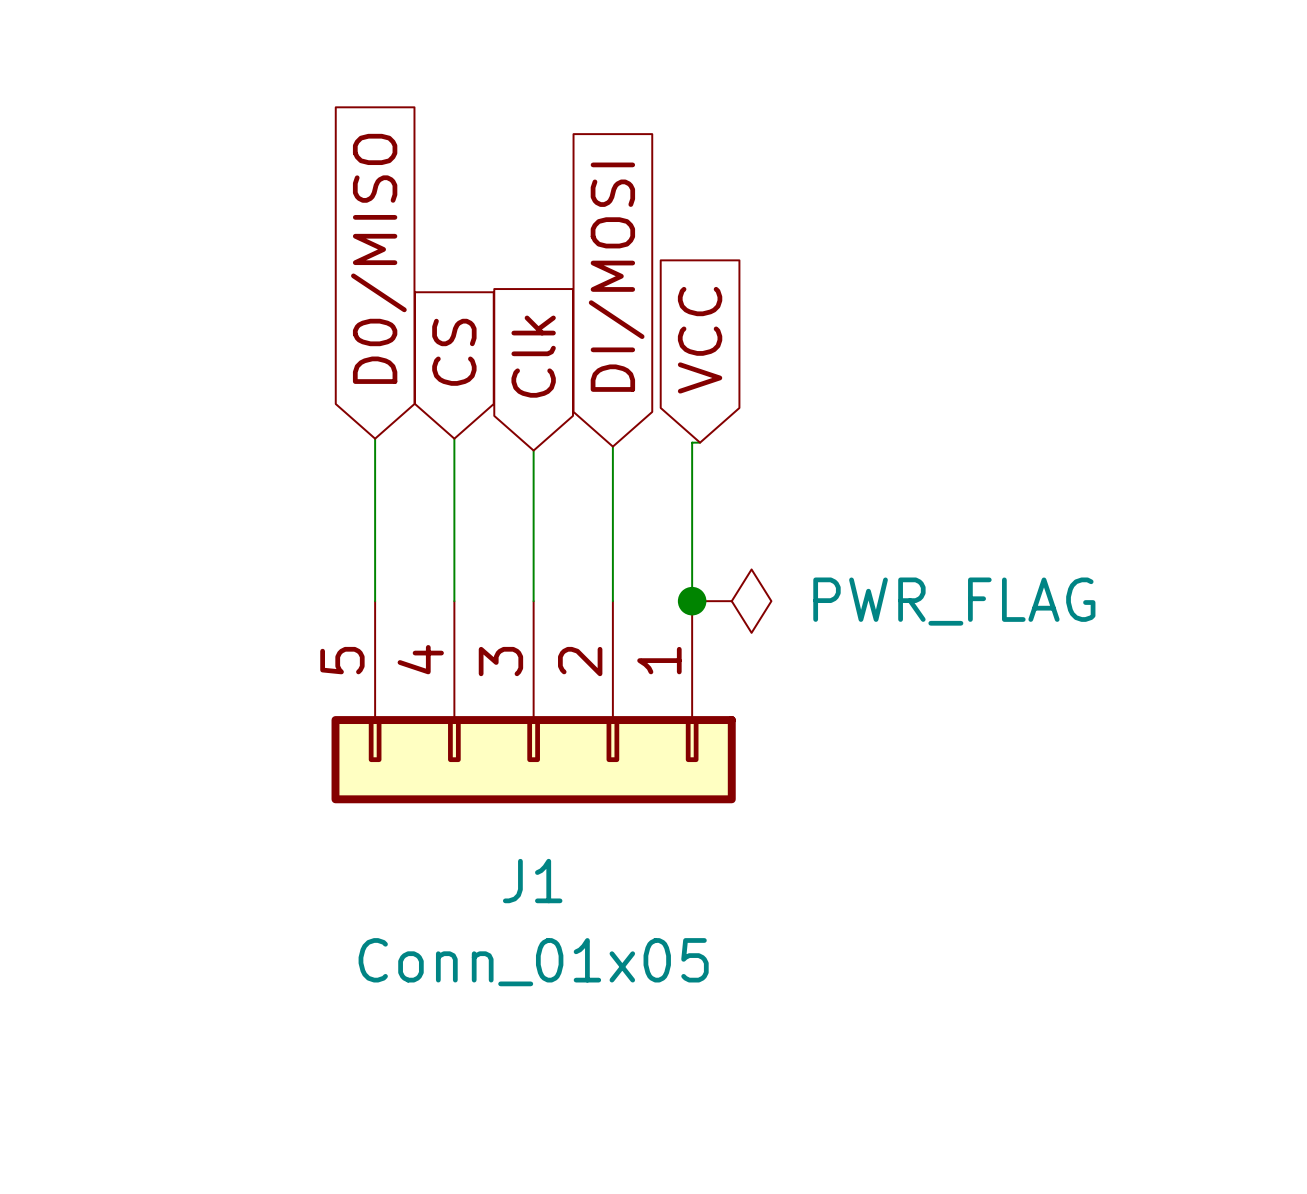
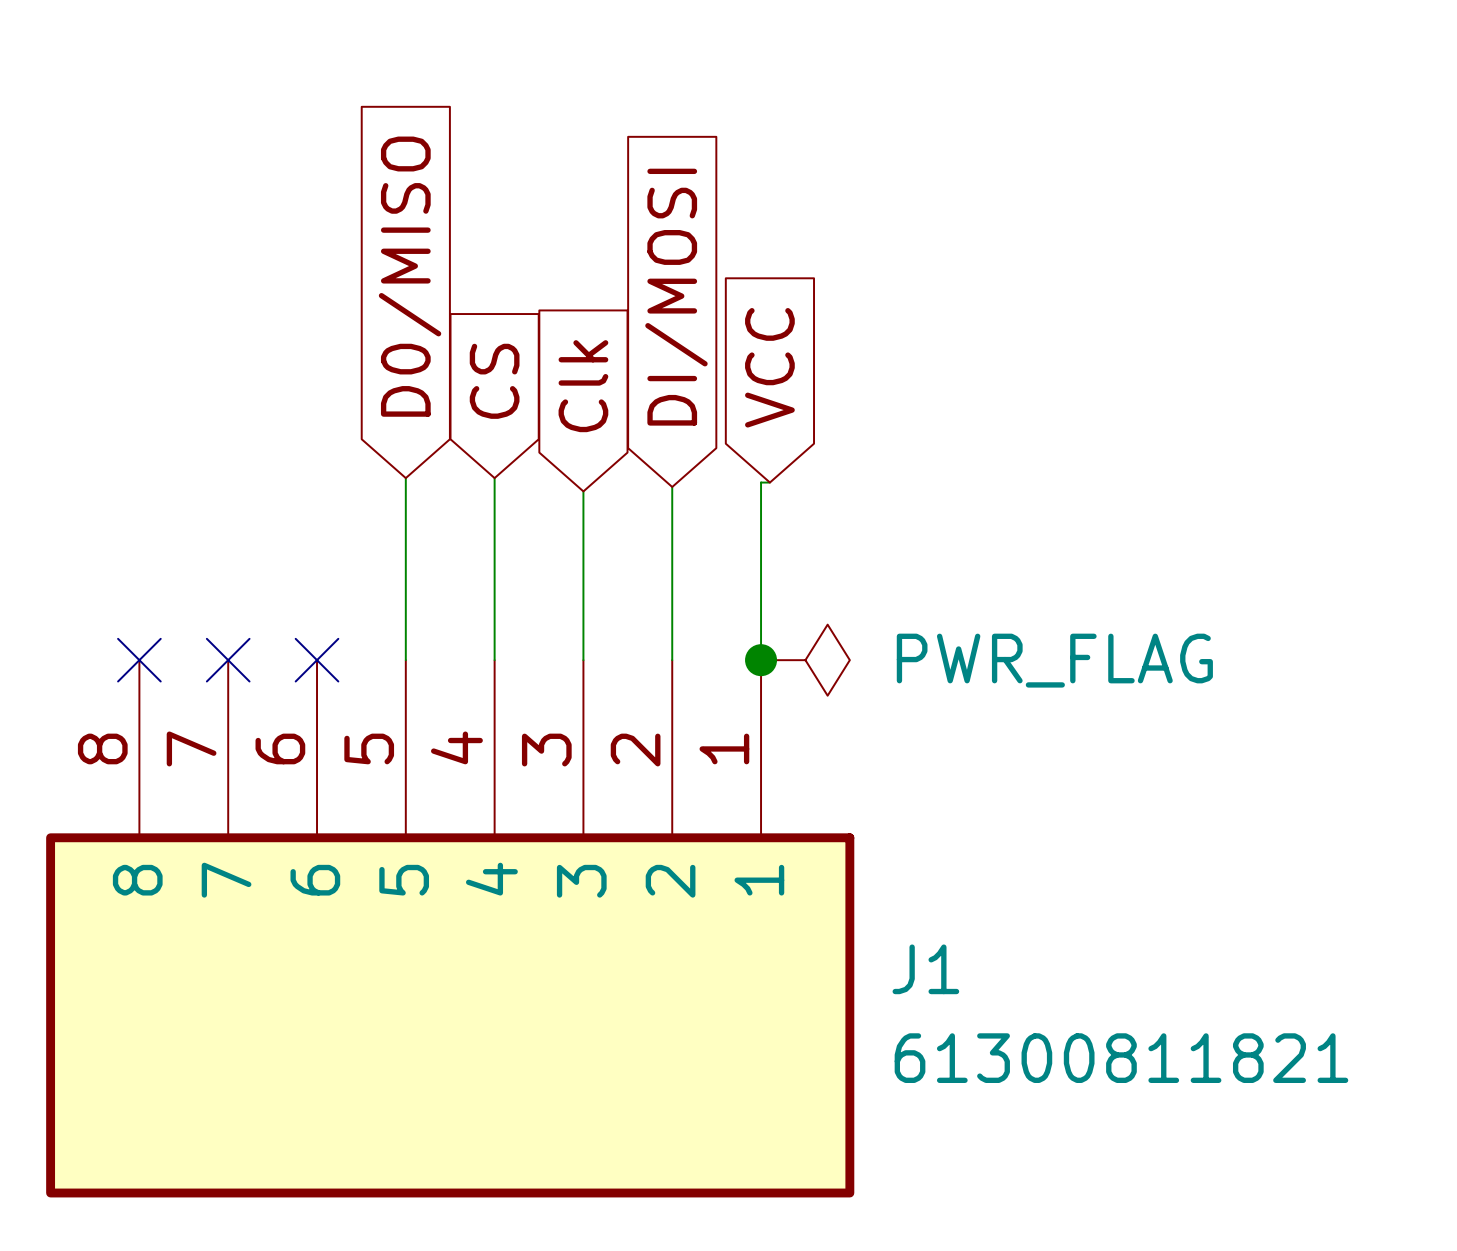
no-connect mark: none -> (139, 660)
no-connect mark: none -> (228, 660)
no-connect mark: none -> (317, 660)
J1 symbol: [331, 601, 736, 804] -> [46, 660, 855, 1198]
J1 name position: J1 (532, 881) -> J1 (925, 969)
J1 value: Conn_01x05 (533, 962) -> 61300811821 (1121, 1058)

